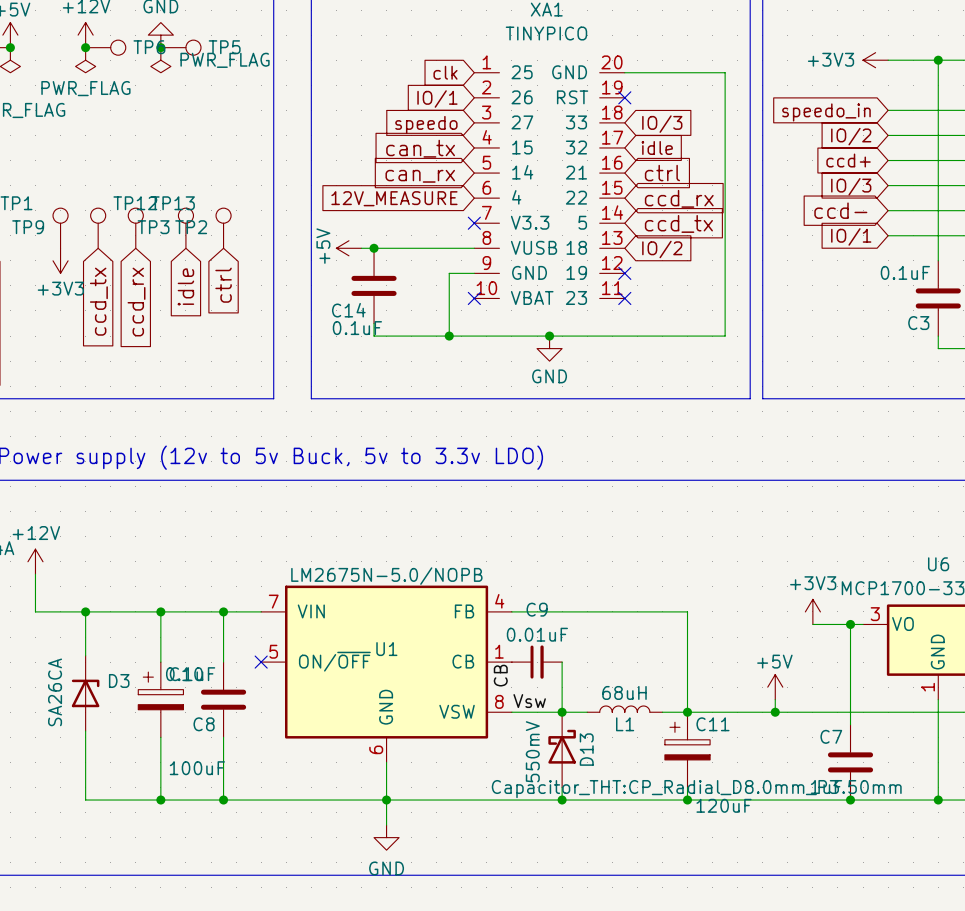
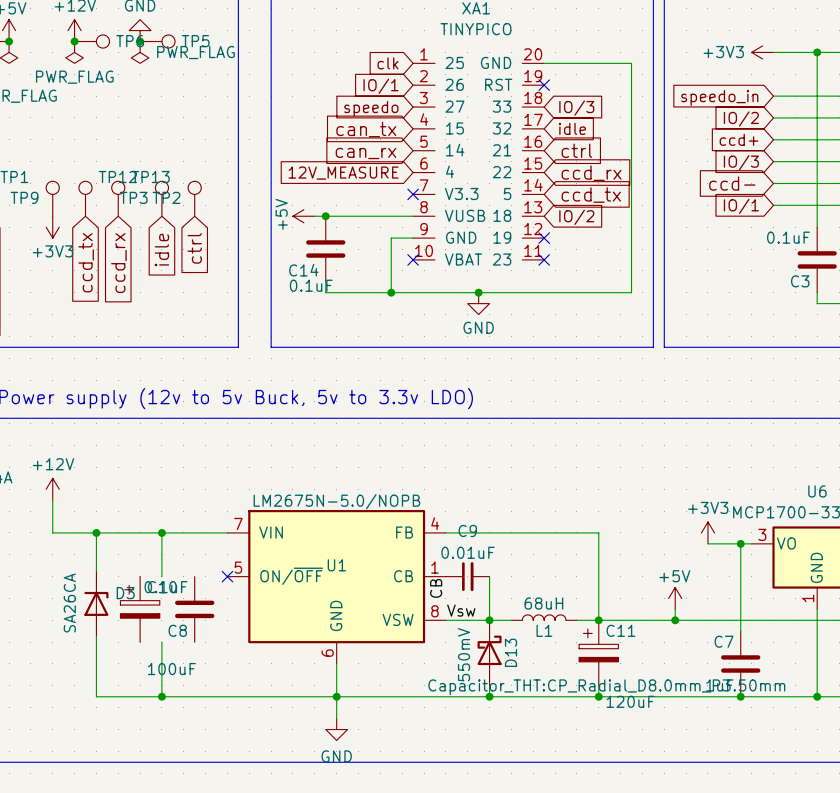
power symbol position: +12V (35, 561) -> +12V (52, 489)
wire: (35, 574) (35, 611) (60, 611) -> (52, 500) (52, 532)
wire: (85, 611) (85, 655) -> (96, 532) (96, 571)
junction: (85, 611) -> none
junction: none -> (96, 532)
wire: (160, 611) (160, 662) -> (161, 532) (161, 576)
junction: (160, 611) -> none
junction: none -> (161, 532)
wire: (223, 611) (223, 662) -> none
junction: (223, 611) -> none
D3 position: (85, 693) -> (96, 603)
wire: (85, 731) (85, 800) (110, 800) -> (96, 636) (96, 696)
wire: (160, 737) (160, 800) -> (161, 642) (161, 696)
wire: (223, 737) (223, 800) -> none
junction: (160, 800) -> none
junction: none -> (161, 696)
junction: (223, 800) -> none

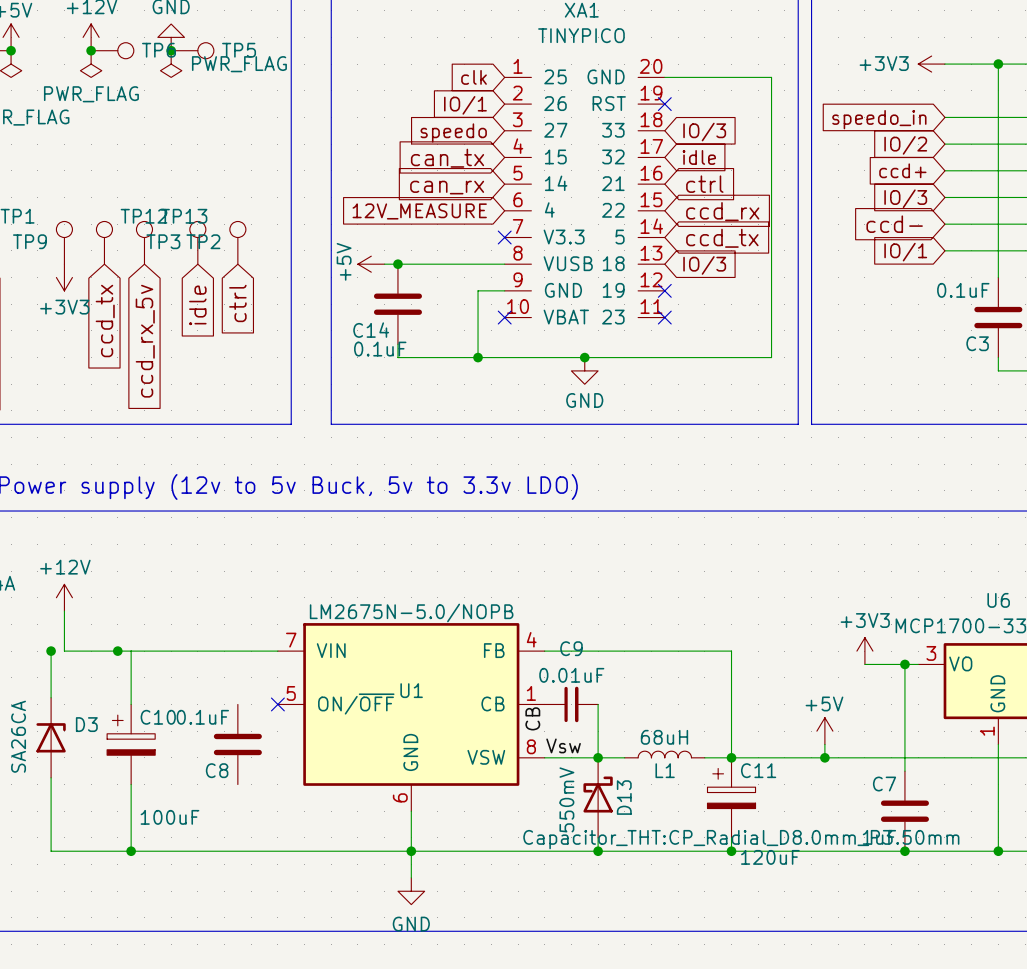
global label: IO/2 (576, 217) -> IO/3 (704, 265)
global label: ccd_rx (118, 263) -> ccd_rx_5v (145, 341)
junction: none -> (51, 651)
wire: (96, 532) (96, 571) -> (51, 651) (51, 697)
wire: (161, 532) (161, 576) -> (131, 651) (131, 704)
junction: (161, 532) -> none
D3 position: (96, 603) -> (51, 737)
C10 position: (140, 609) -> (131, 744)
wire: (96, 636) (96, 696) -> (51, 777) (51, 851) (117, 851)
wire: (161, 642) (161, 696) -> (131, 784) (131, 851)
junction: none -> (131, 851)
junction: (161, 696) -> none

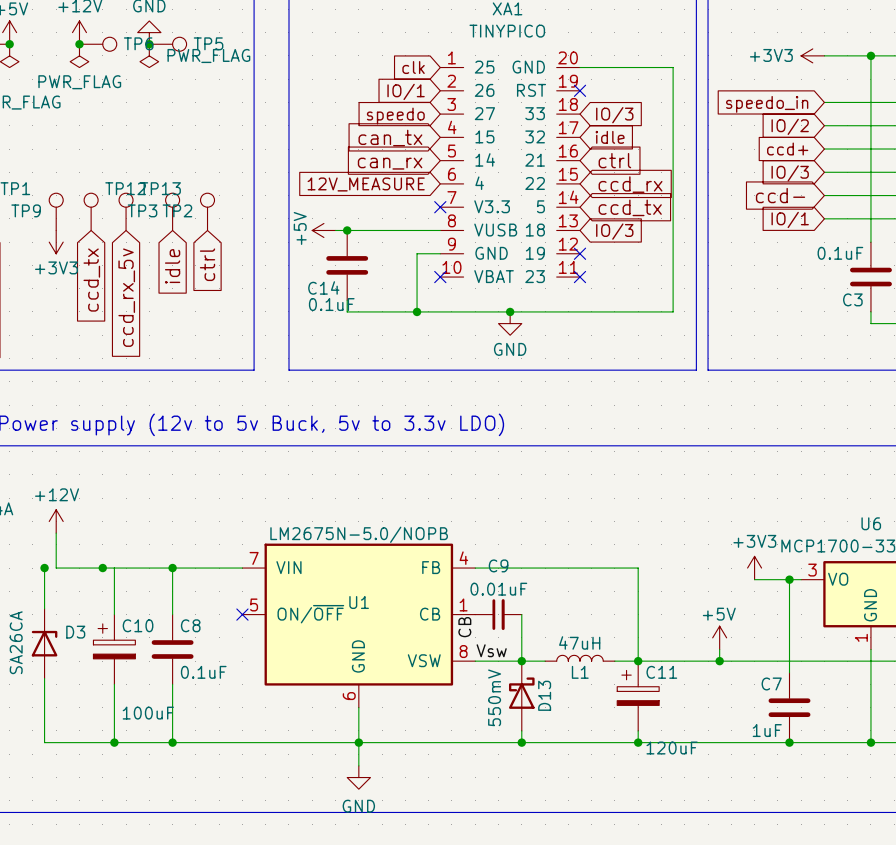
wire: none -> (172, 568) (172, 614)
junction: none -> (172, 568)
C8 value position: 0.1uF (202, 717) -> 0.1uF (203, 672)
L1 value: 68uH (664, 737) -> 47uH (579, 642)
C8 position: (237, 744) -> (172, 649)
C8 name position: C8 (217, 770) -> C8 (190, 625)
wire: none -> (172, 684) (172, 742)
C11 text: Capacitor_THT:CP_Radial_D8.0mm_P3.50mm (741, 839) -> none
junction: none -> (172, 742)

